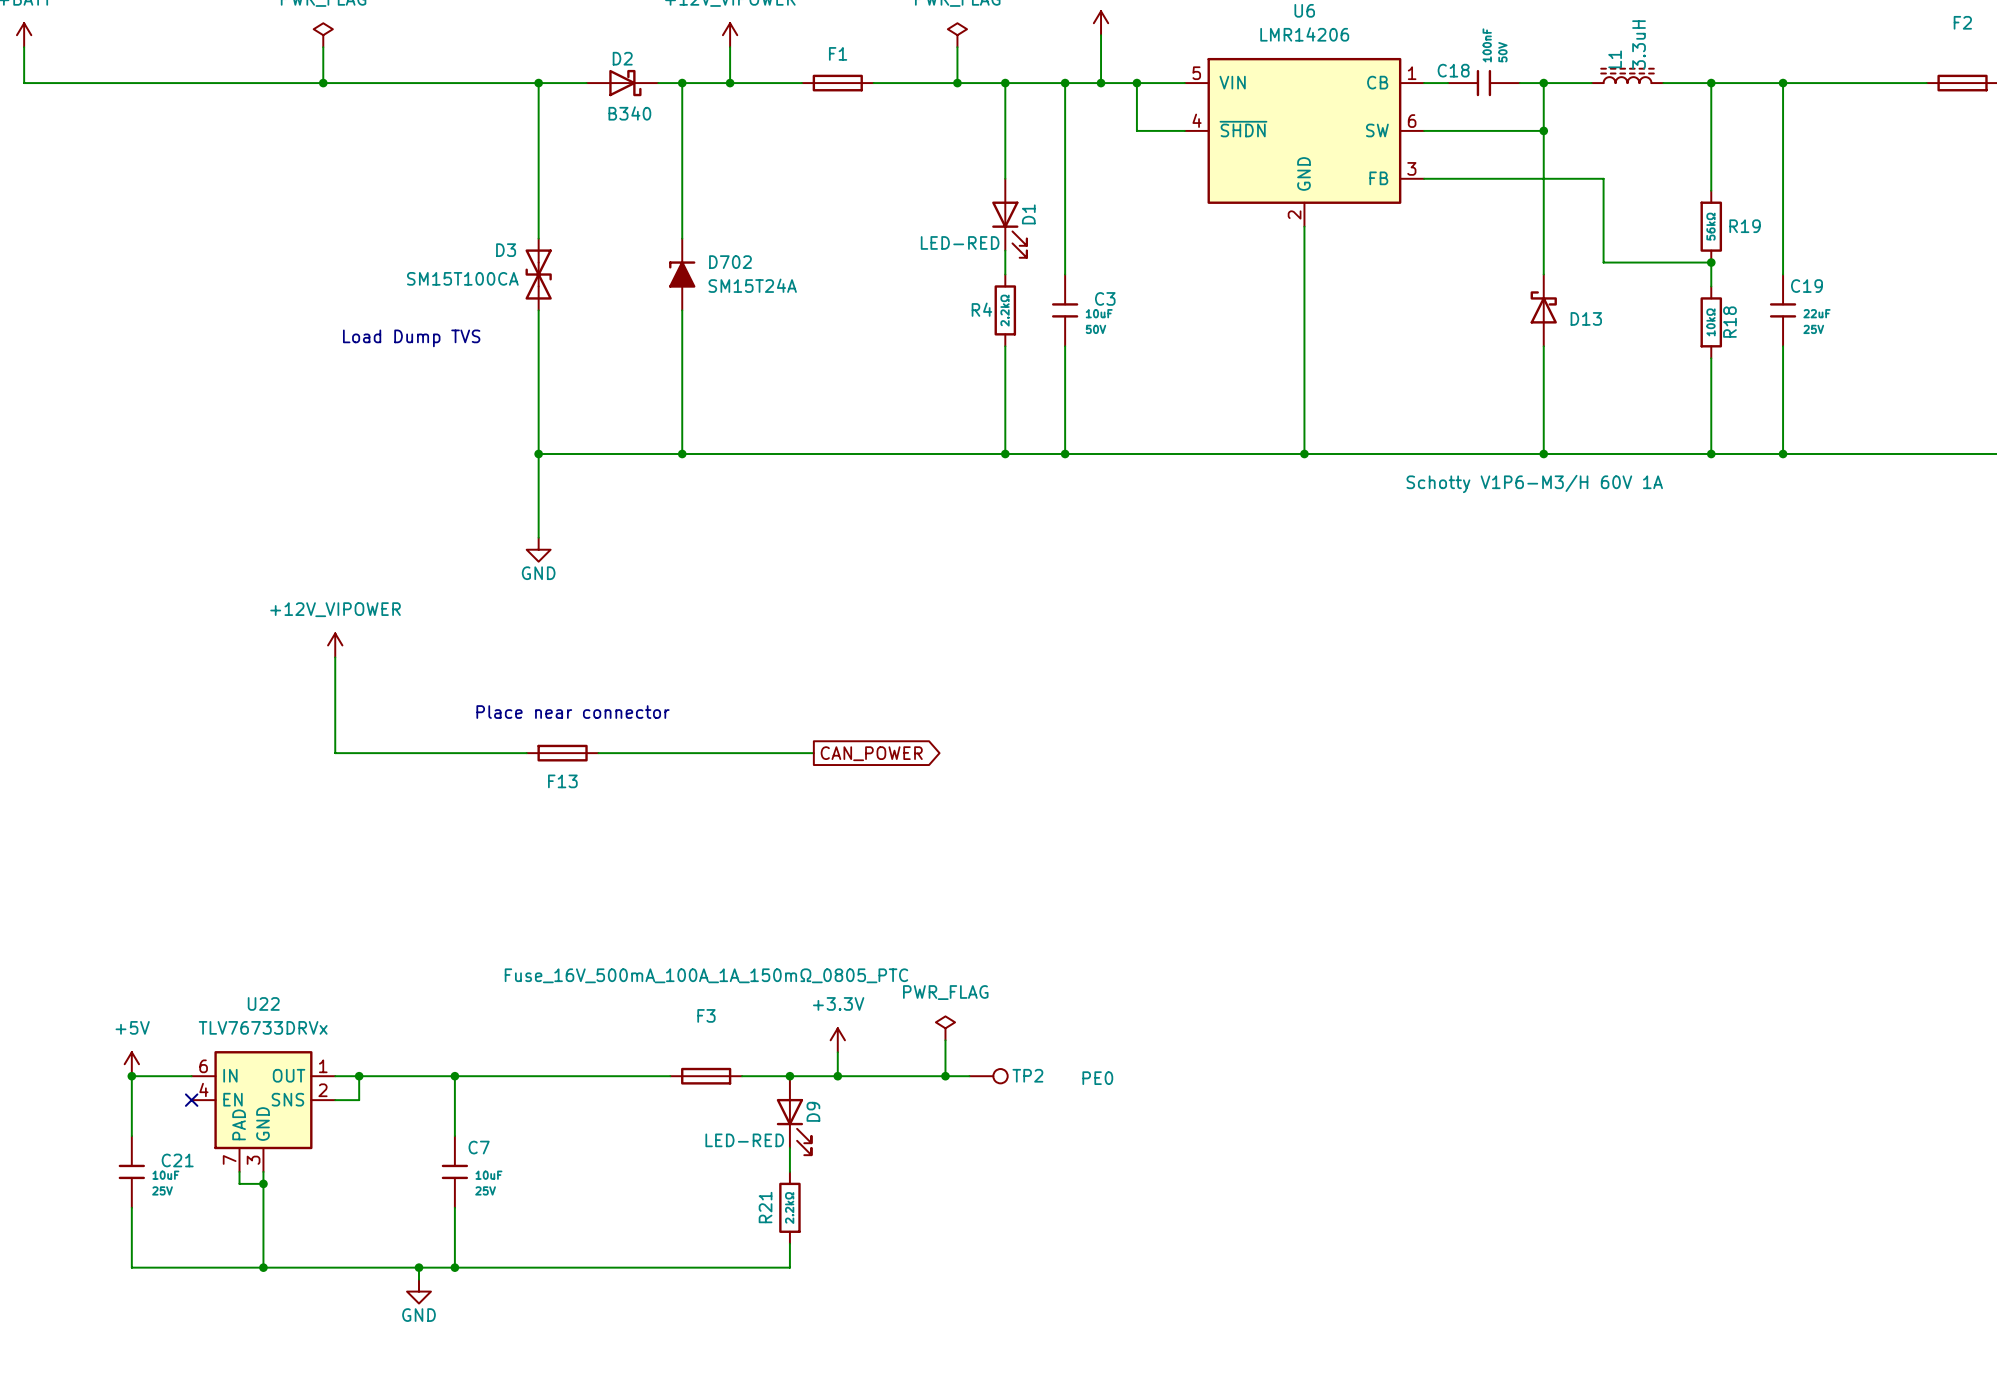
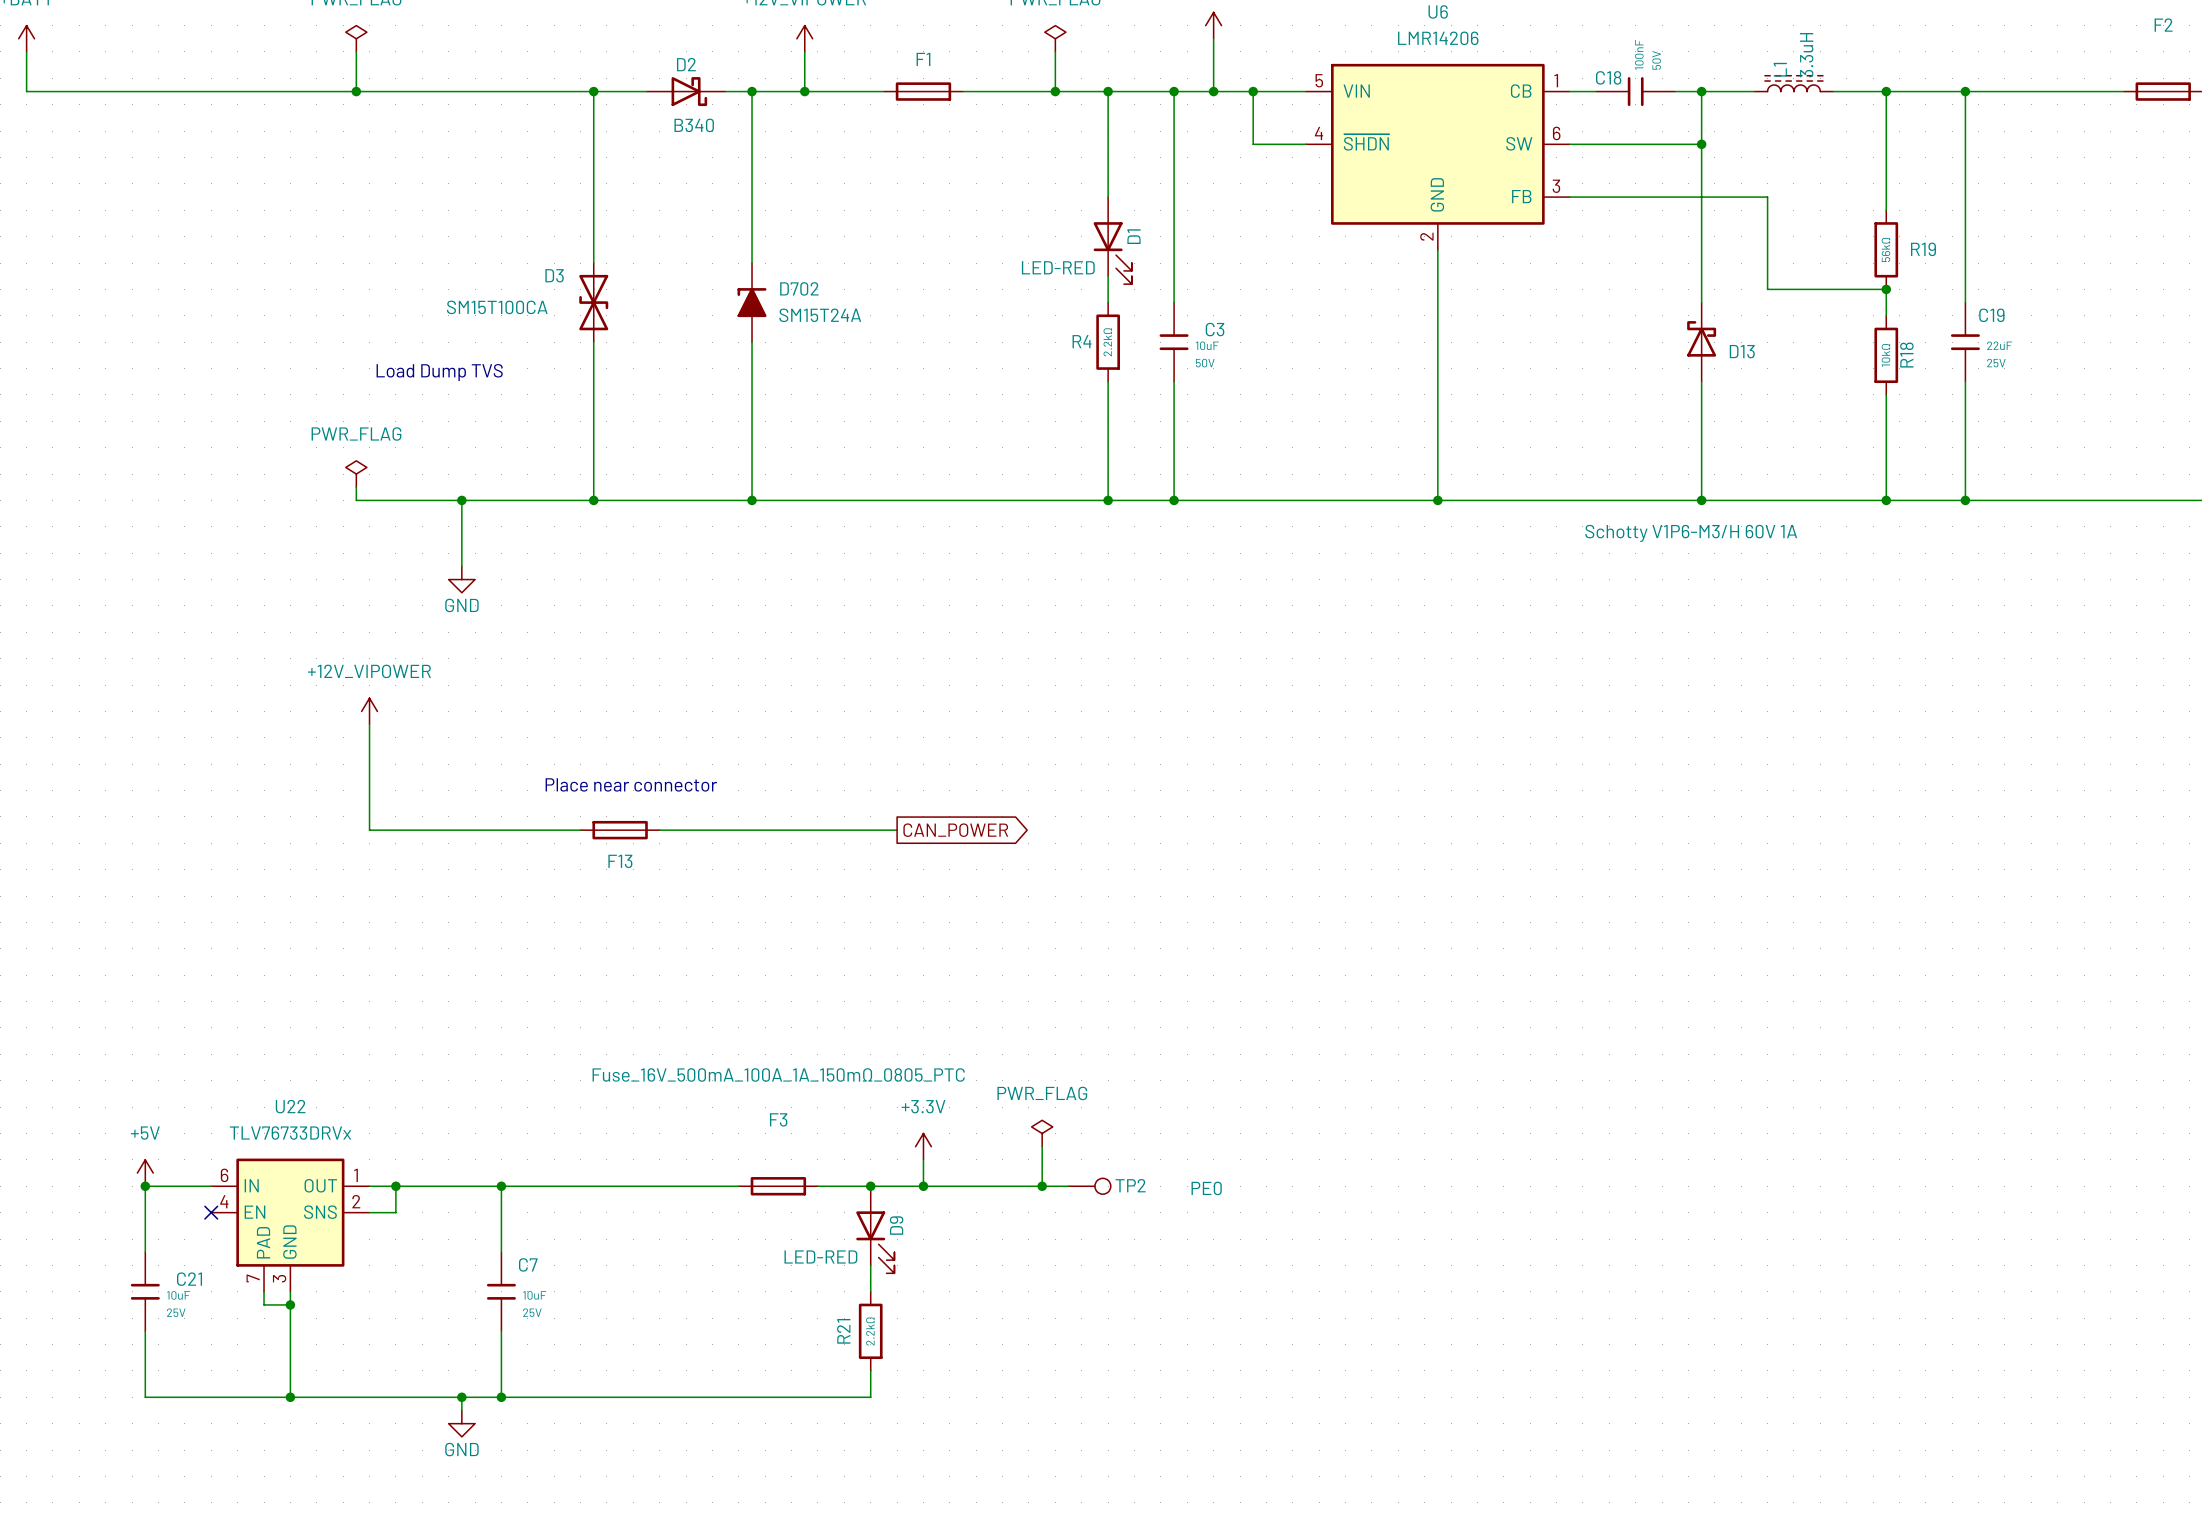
power symbol: none -> PWR_FLAG (356, 474)
wire: none -> (461, 500) (461, 566)
junction: none -> (461, 500)
wire: (538, 454) (538, 537) -> (593, 500) (356, 500) (356, 487)
power symbol position: GND (538, 549) -> GND (461, 579)

